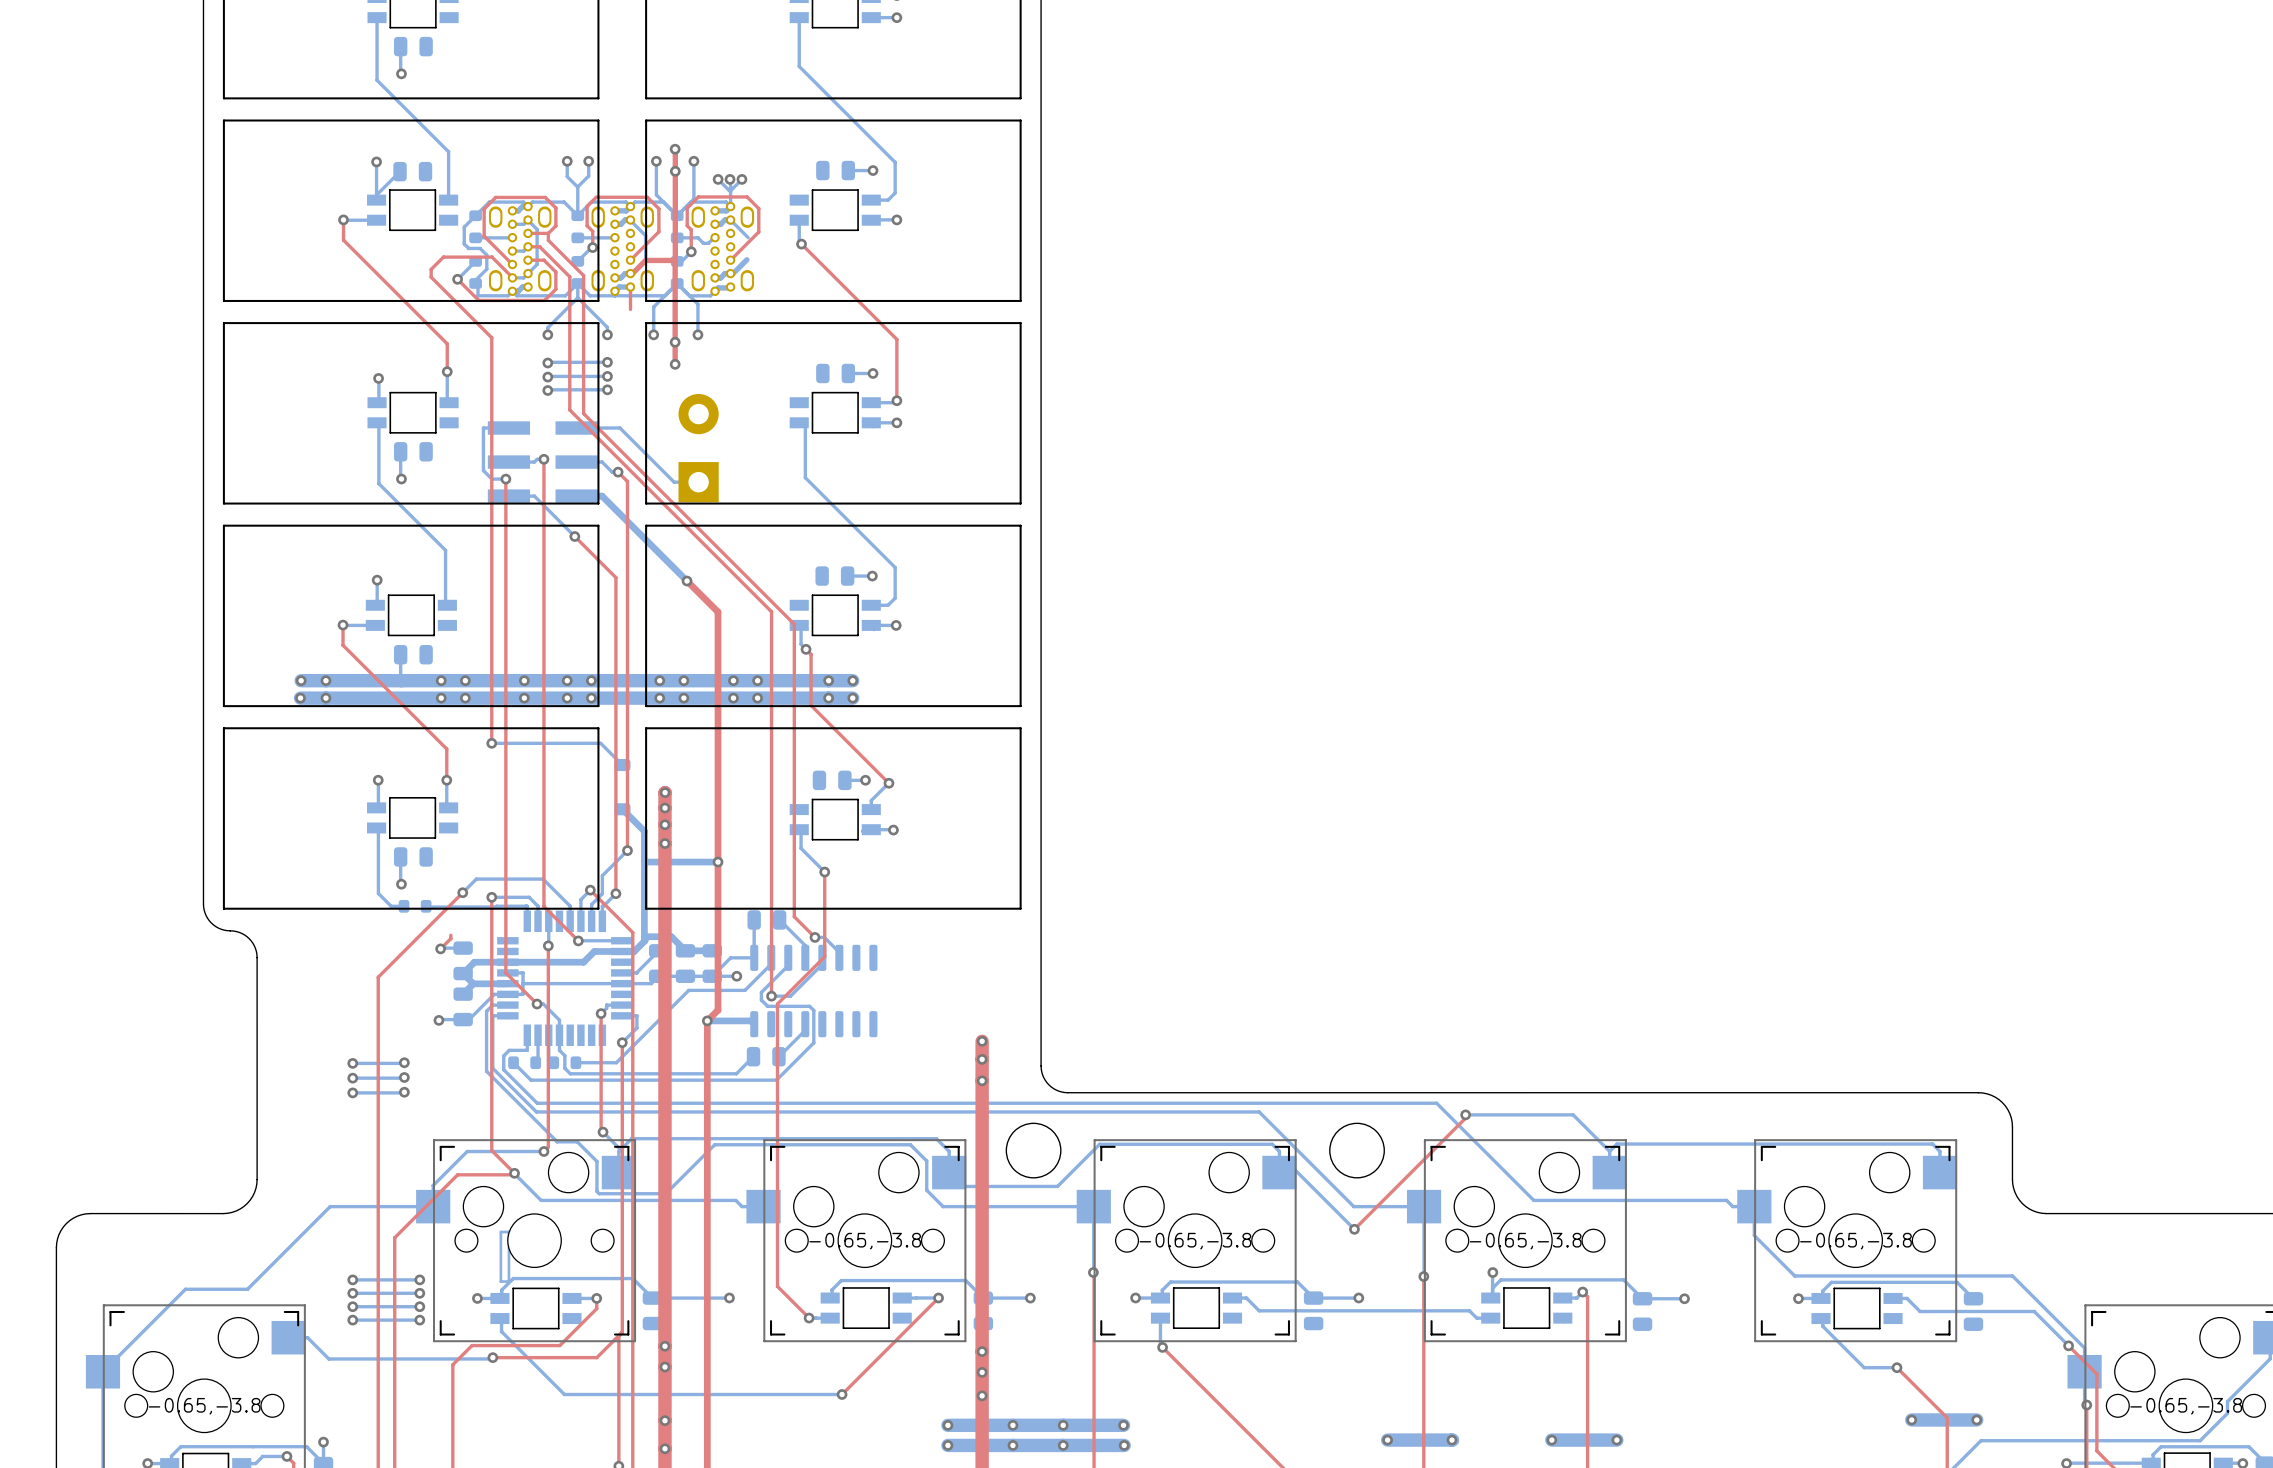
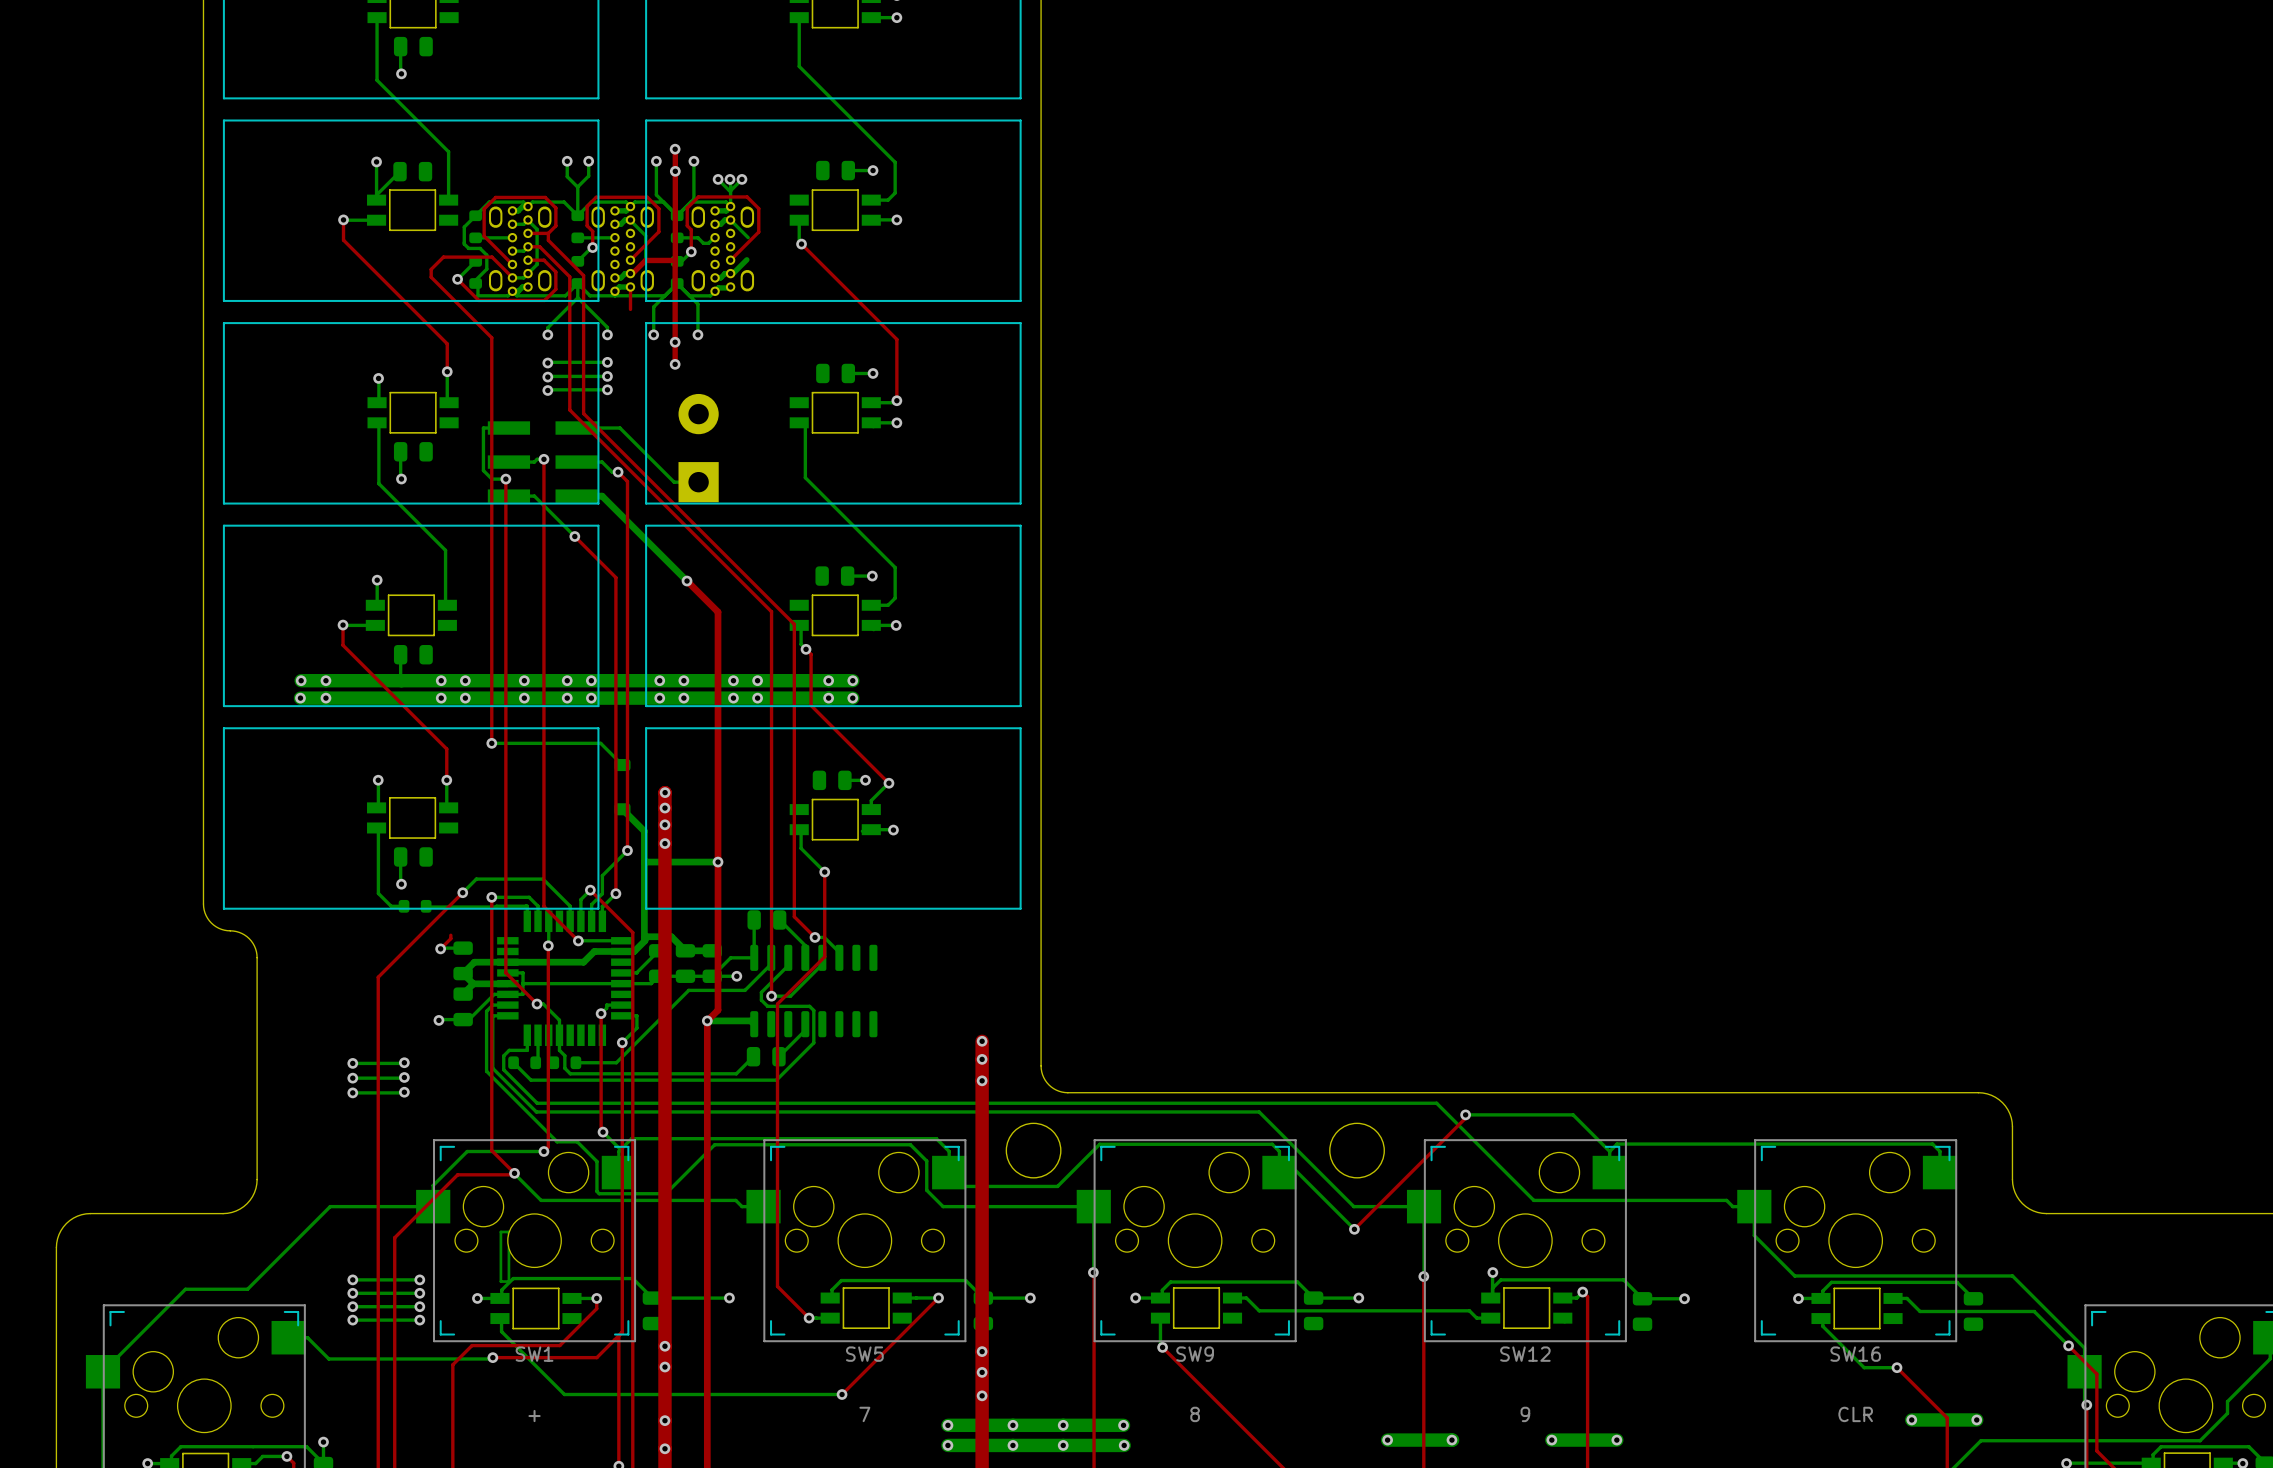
SW5 text: -0.65,-3.8 (865, 1241) -> none
SW9 text: -0.65,-3.8 (1195, 1241) -> none
SW12 text: -0.65,-3.8 (1525, 1241) -> none
SW16 text: -0.65,-3.8 (1855, 1241) -> none
SW1 name: none -> SW1 (534, 1354)
SW5 name: none -> SW5 (864, 1354)
SW9 name: none -> SW9 (1195, 1354)
SW12 name: none -> SW12 (1525, 1354)
SW16 name: none -> SW16 (1855, 1354)
part text: -0.65,-3.8 (204, 1406) -> none
part text: -0.65,-3.8 (2186, 1406) -> none
SW5 value: none -> 7 (864, 1414)
SW9 value: none -> 8 (1195, 1414)
SW12 value: none -> 9 (1525, 1414)
SW16 value: none -> CLR (1855, 1414)
SW1 value: none -> + (534, 1416)

